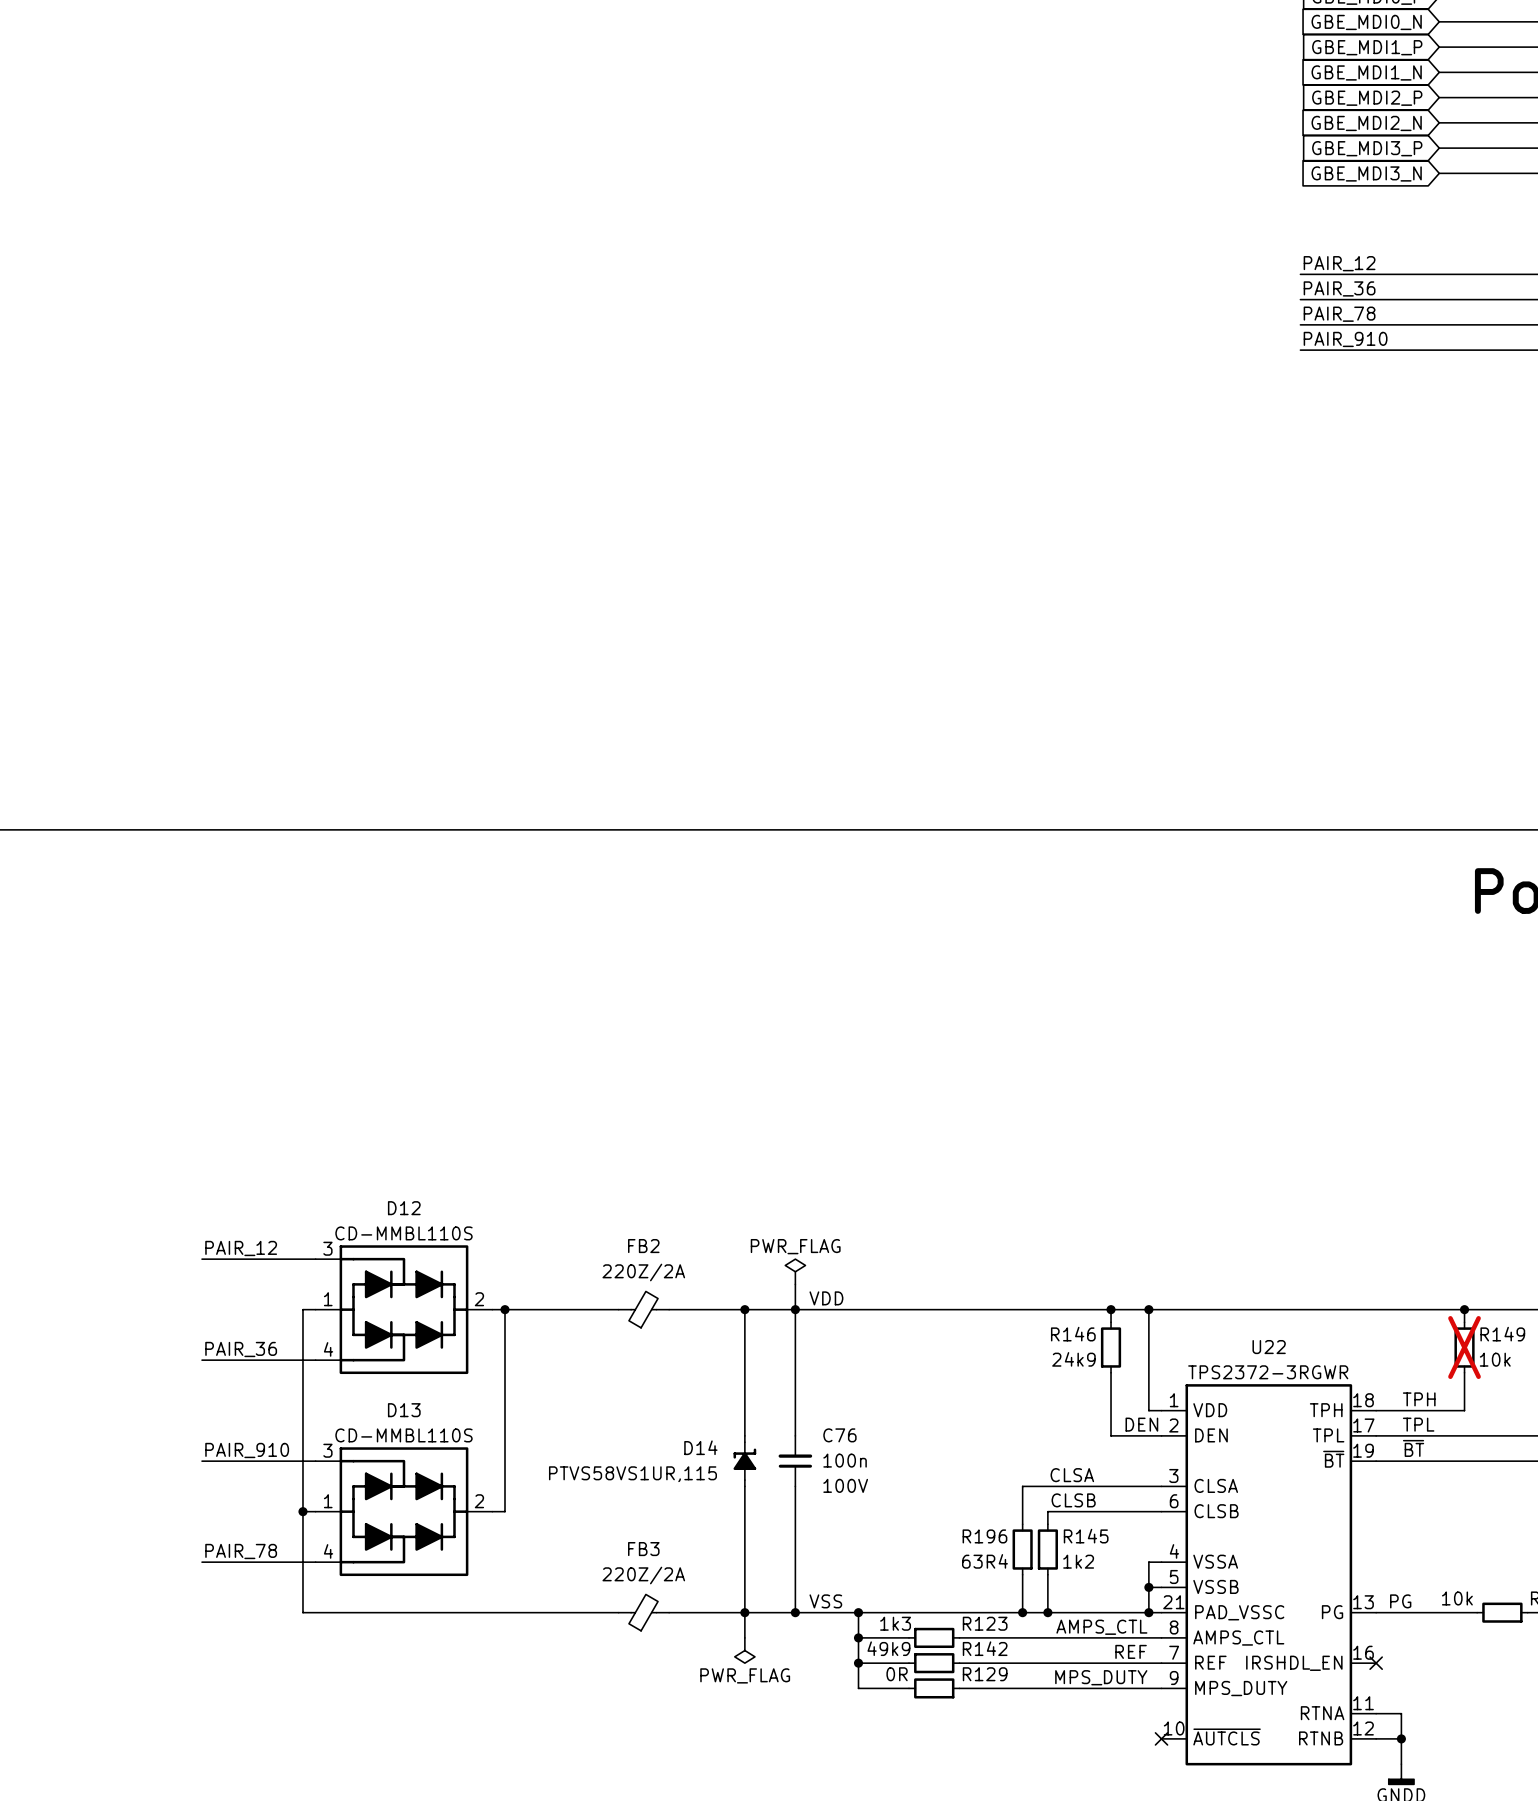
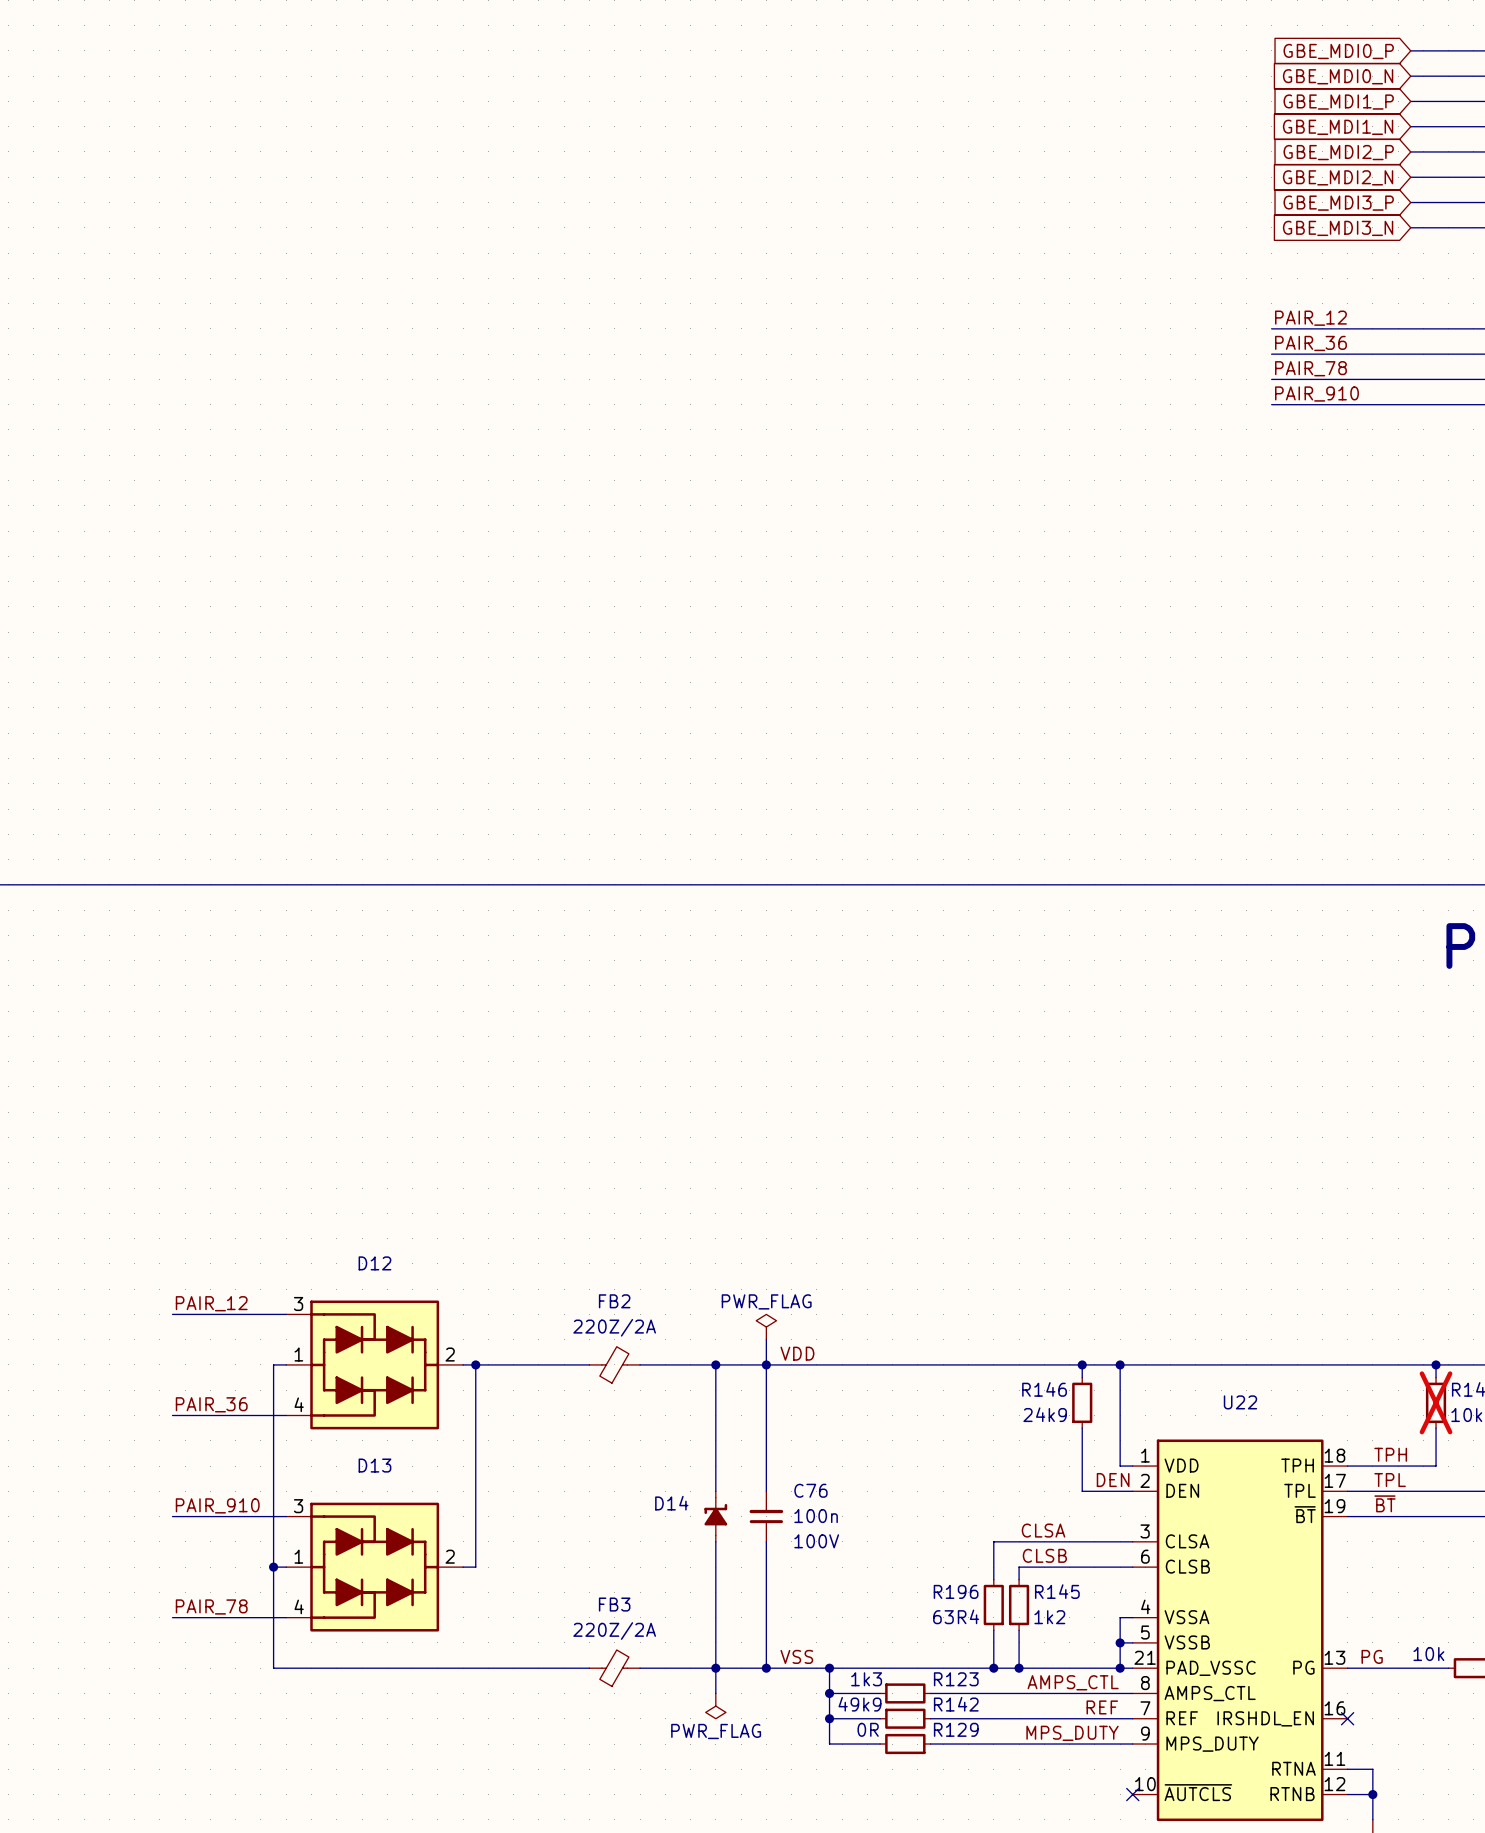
D12 text: CD-MMBL110S (403, 1233) -> none
U22 text: TPS2372-3RGWR (1268, 1372) -> none
D13 text: CD-MMBL110S (403, 1435) -> none
D14 text: PTVS58VS1UR,115 (632, 1474) -> none

